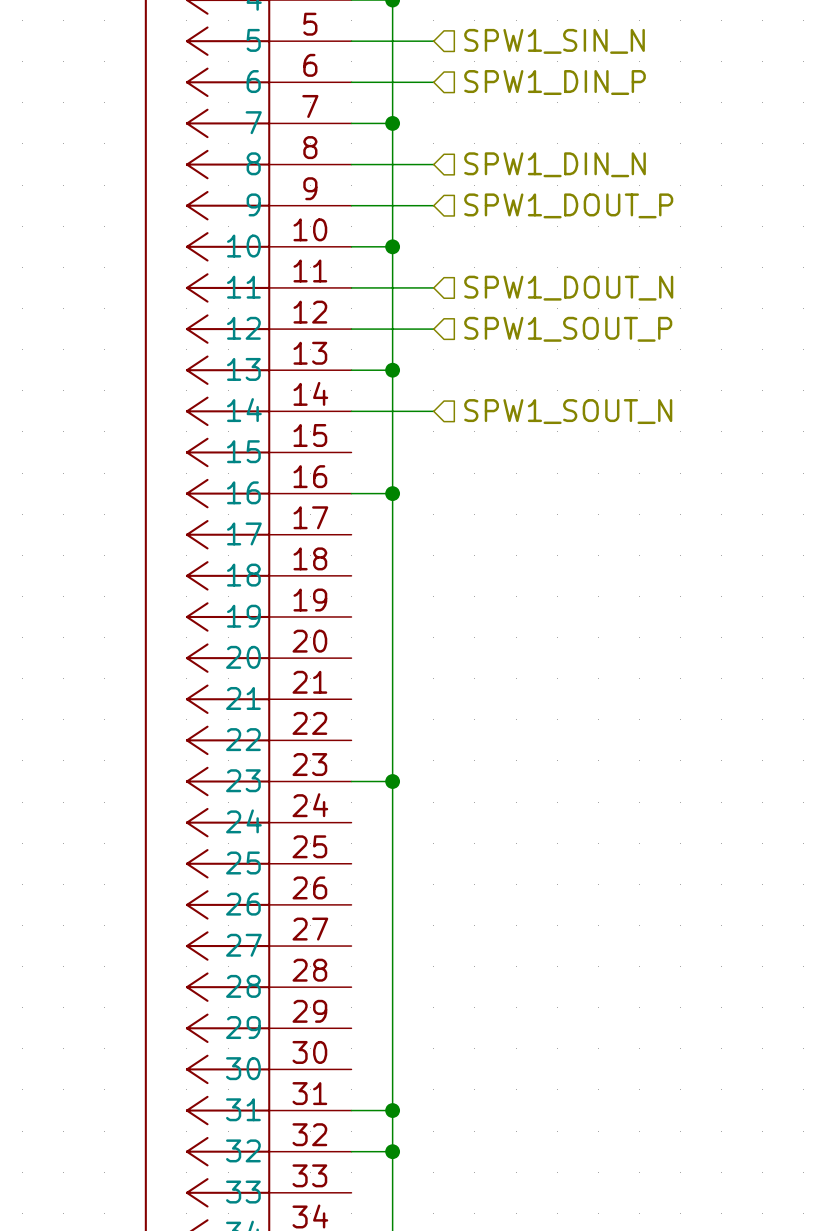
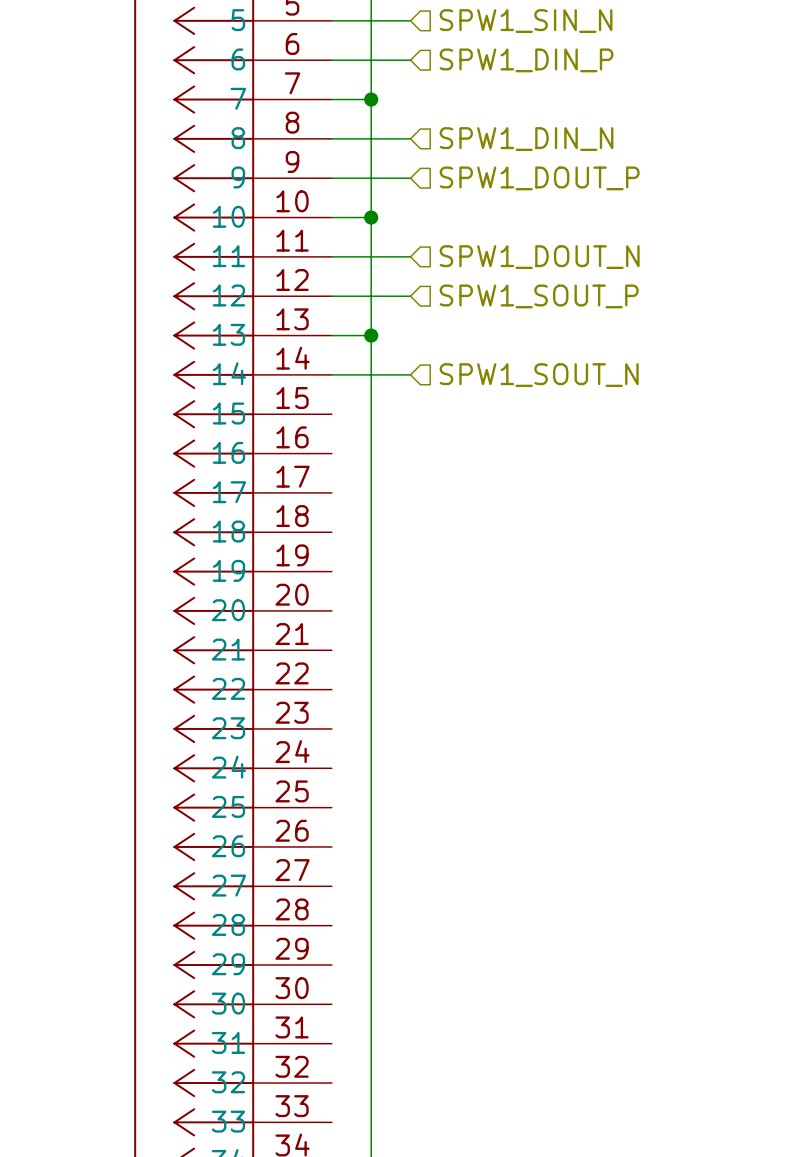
wire: (351, 493) (392, 493) -> none
junction: (392, 493) -> none
wire: (351, 781) (392, 781) -> none
junction: (392, 781) -> none
wire: (351, 1110) (392, 1110) -> none
junction: (392, 1110) -> none
wire: (351, 1151) (392, 1151) -> none
junction: (392, 1151) -> none

